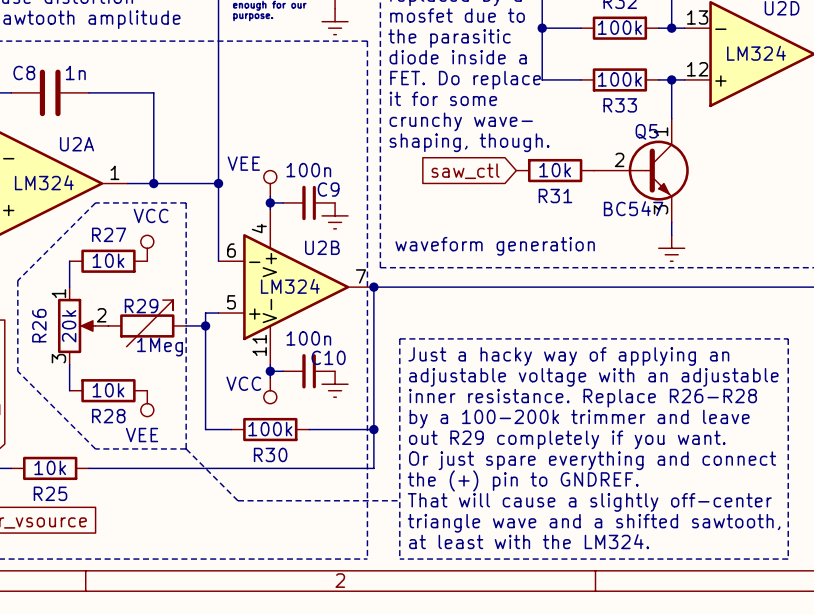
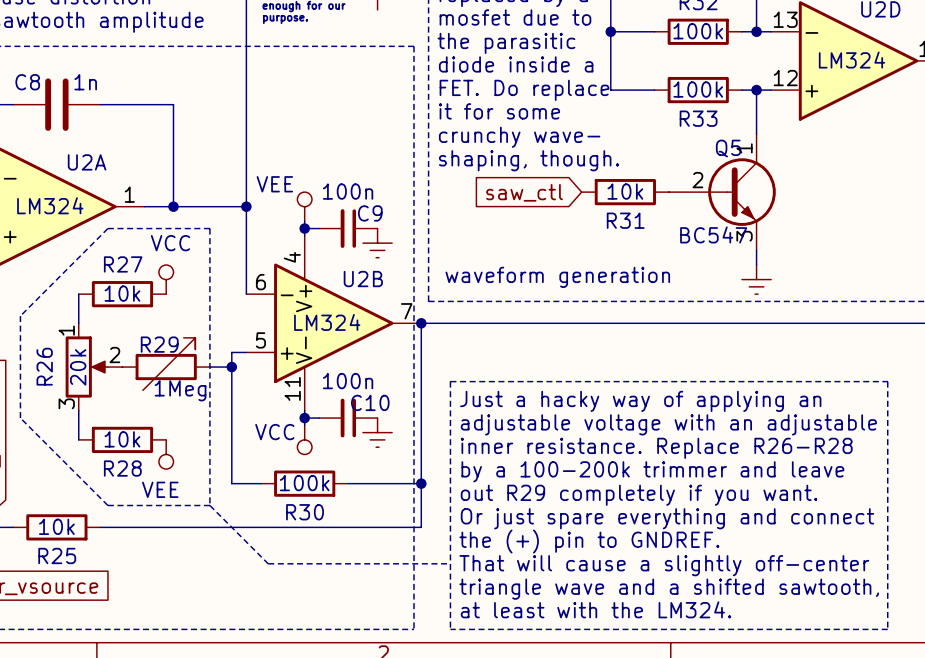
power symbol: (335, 21) -> none

